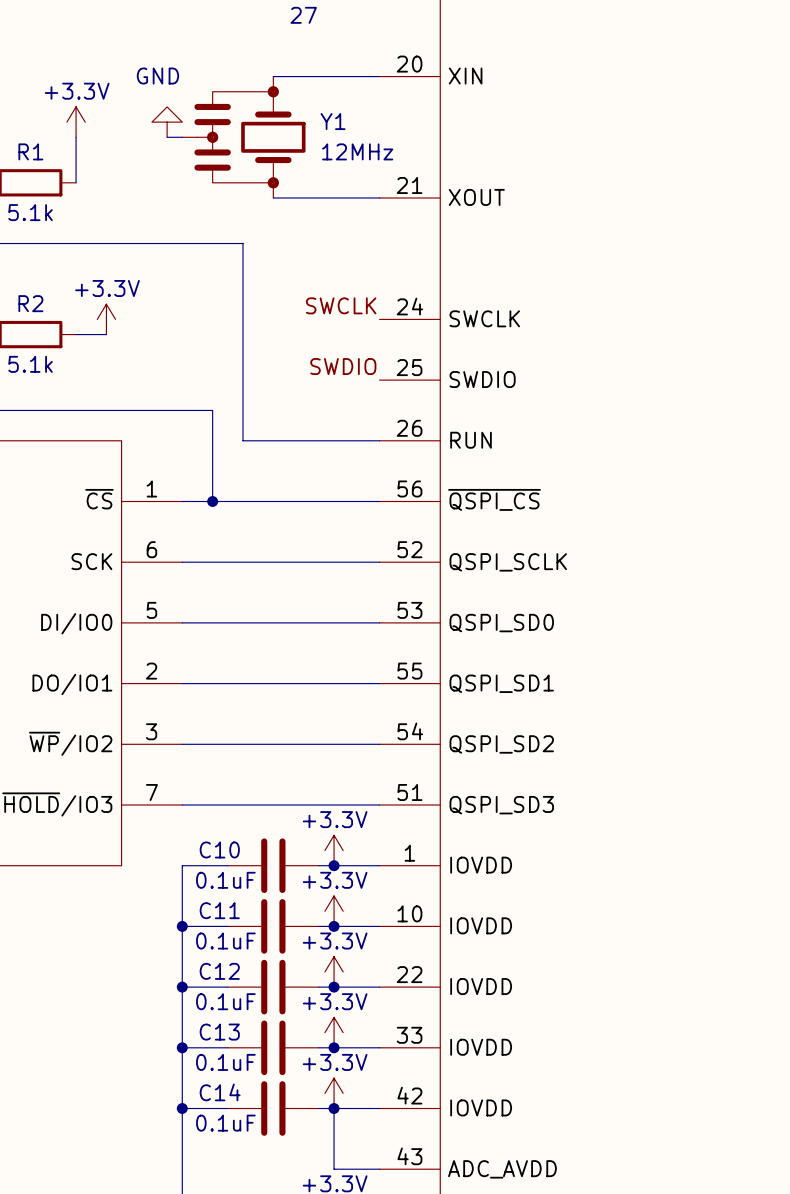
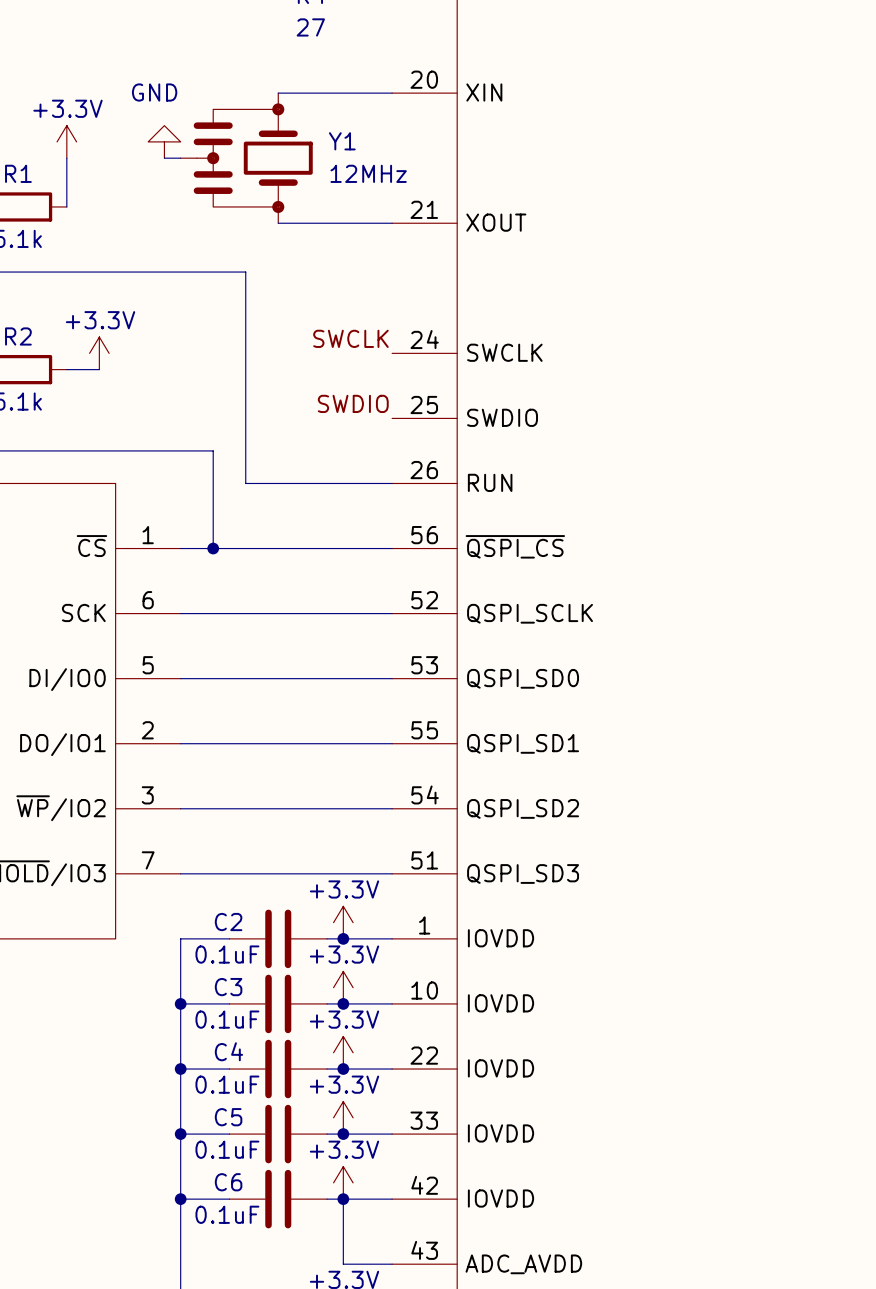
C10 name: C10 (219, 849) -> C2 (228, 922)
C11 name: C11 (219, 910) -> C3 (228, 987)
C12 name: C12 (219, 971) -> C4 (228, 1051)
C13 name: C13 (219, 1032) -> C5 (228, 1117)
C14 name: C14 (220, 1092) -> C6 (228, 1182)

